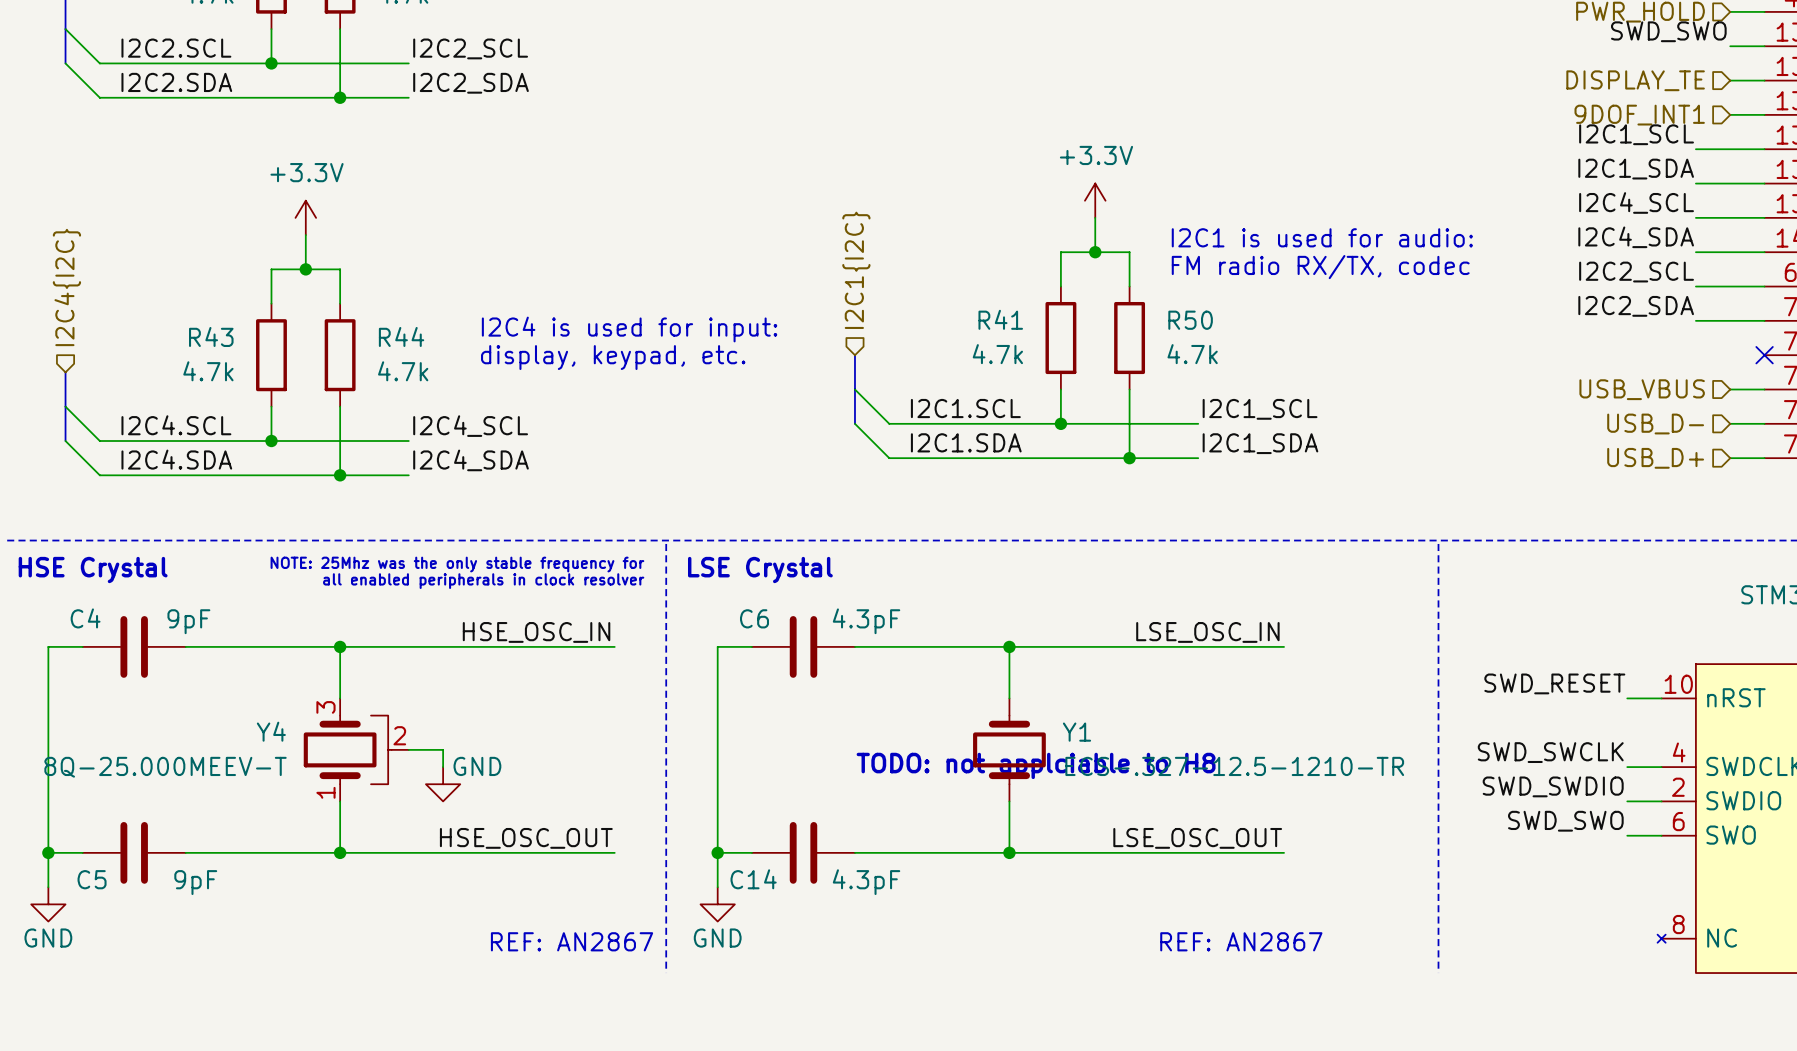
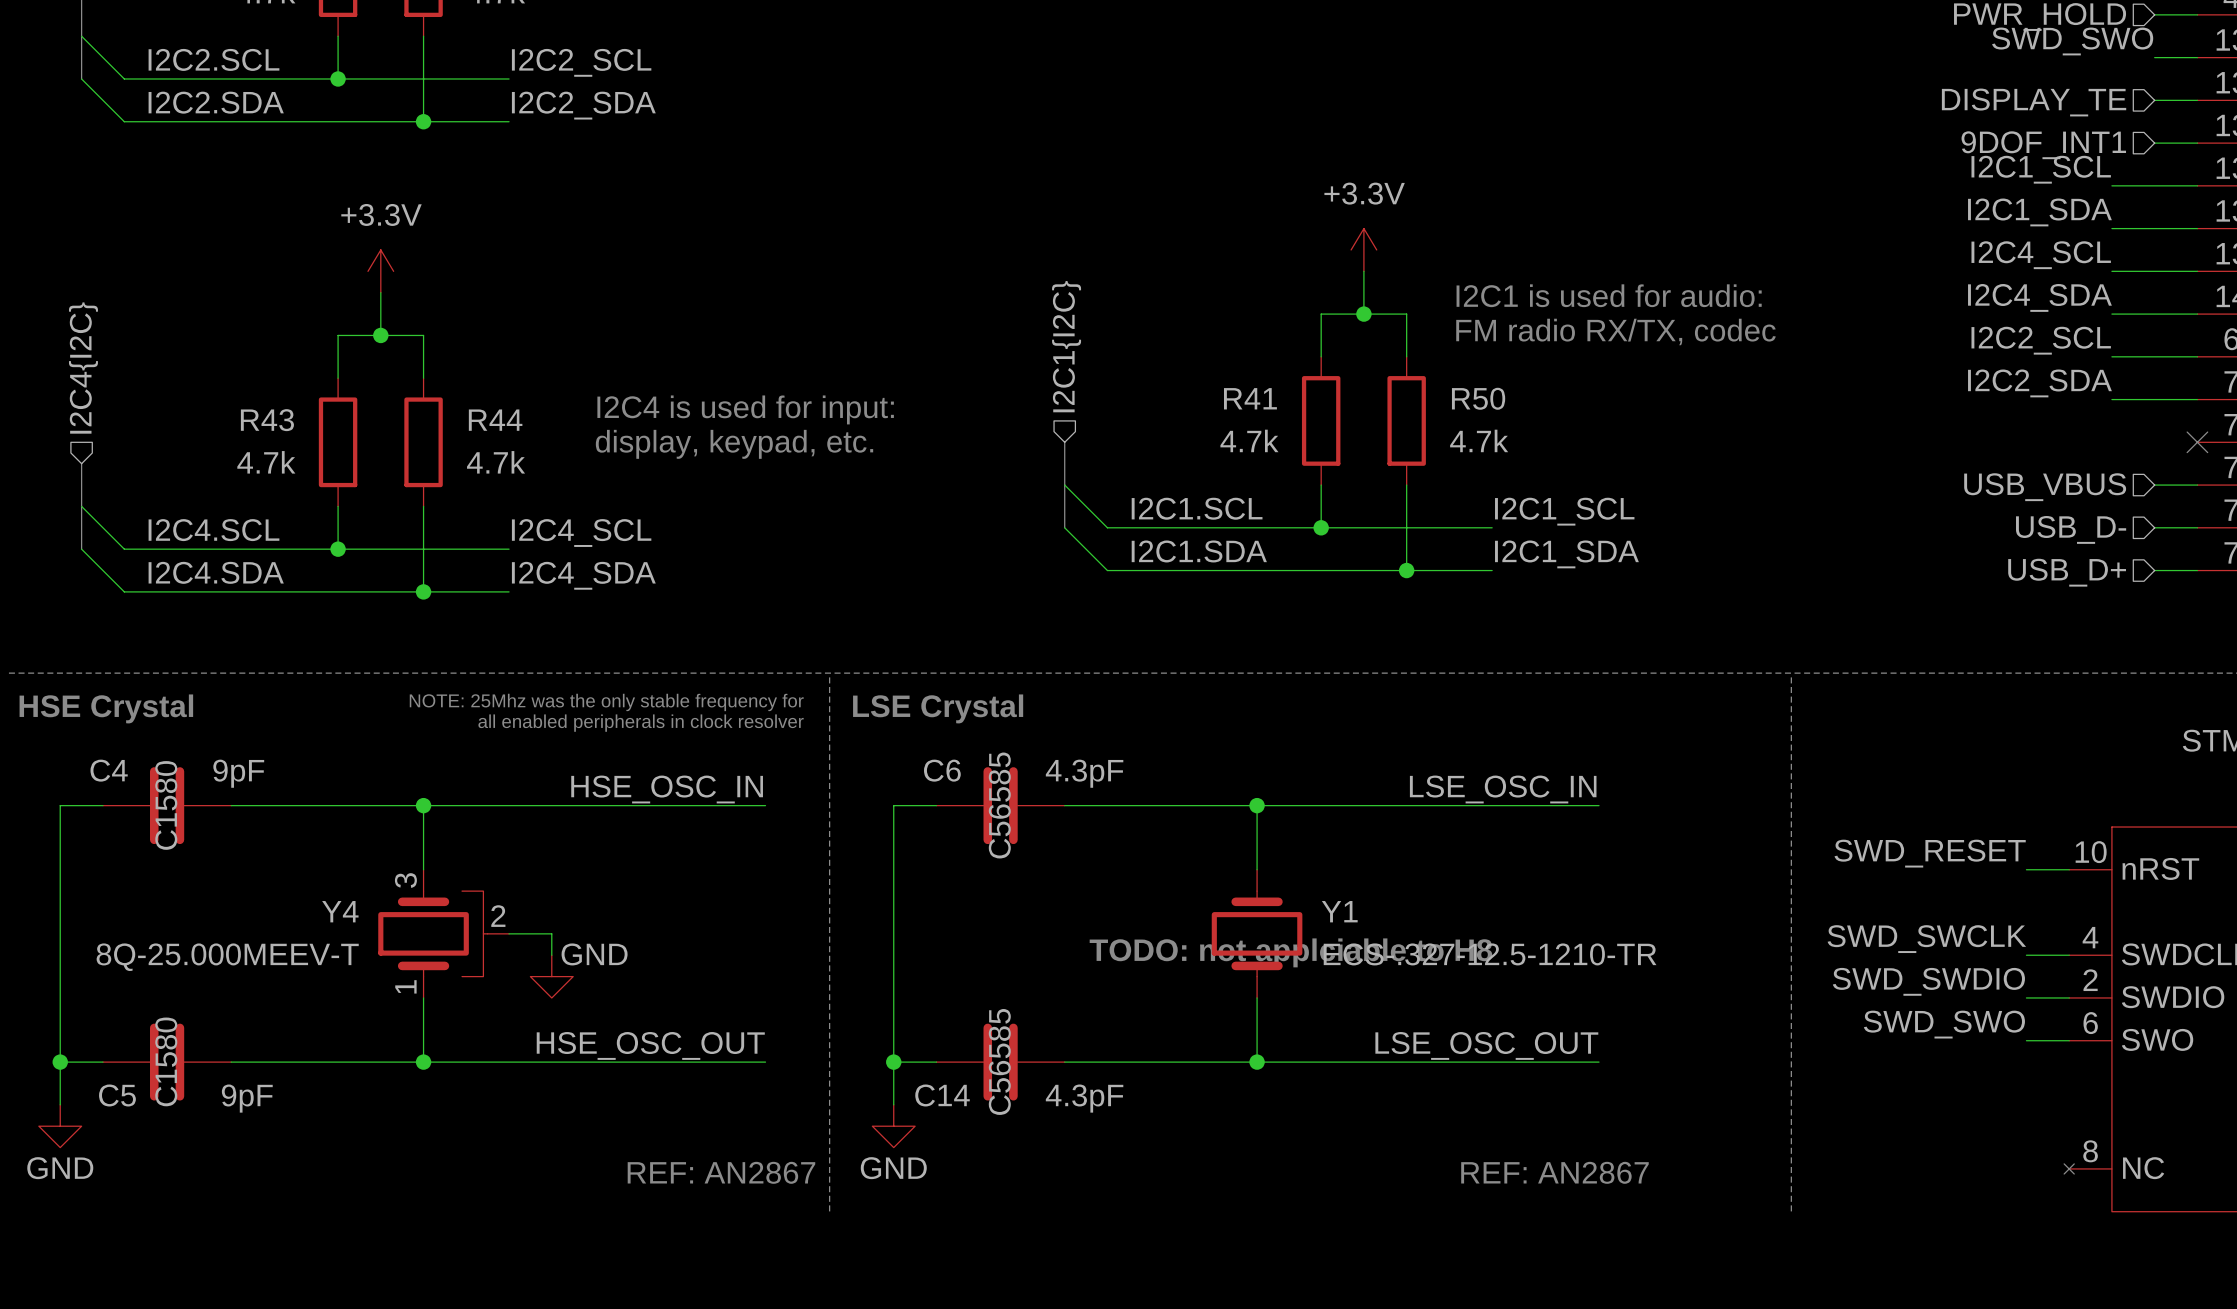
C4 text: none -> C1580 (166, 805)
C6 text: none -> C56585 (999, 805)
C5 text: none -> C1580 (166, 1061)
C14 text: none -> C56585 (999, 1061)

